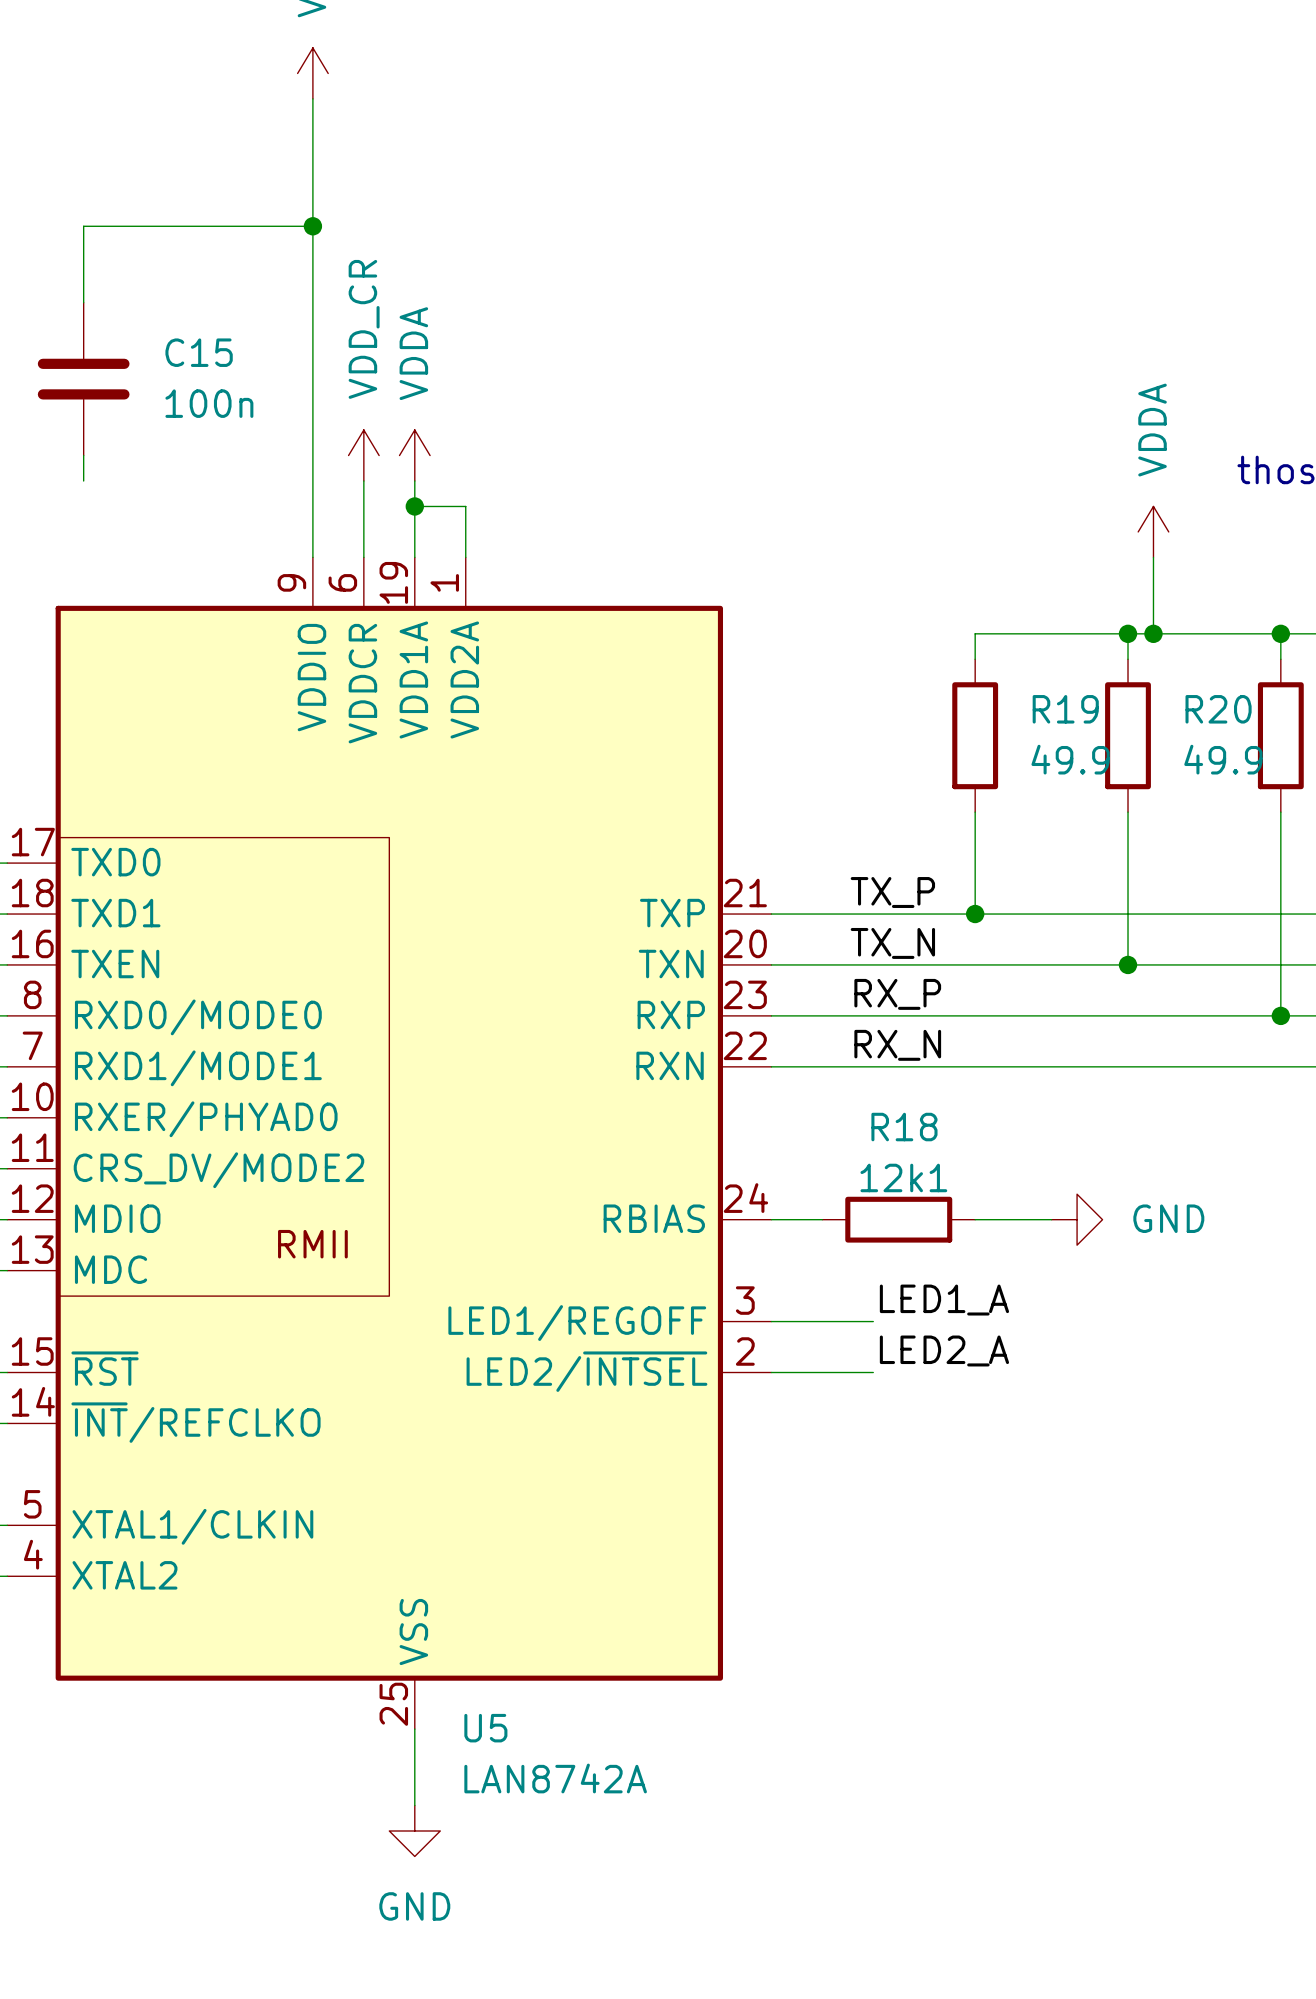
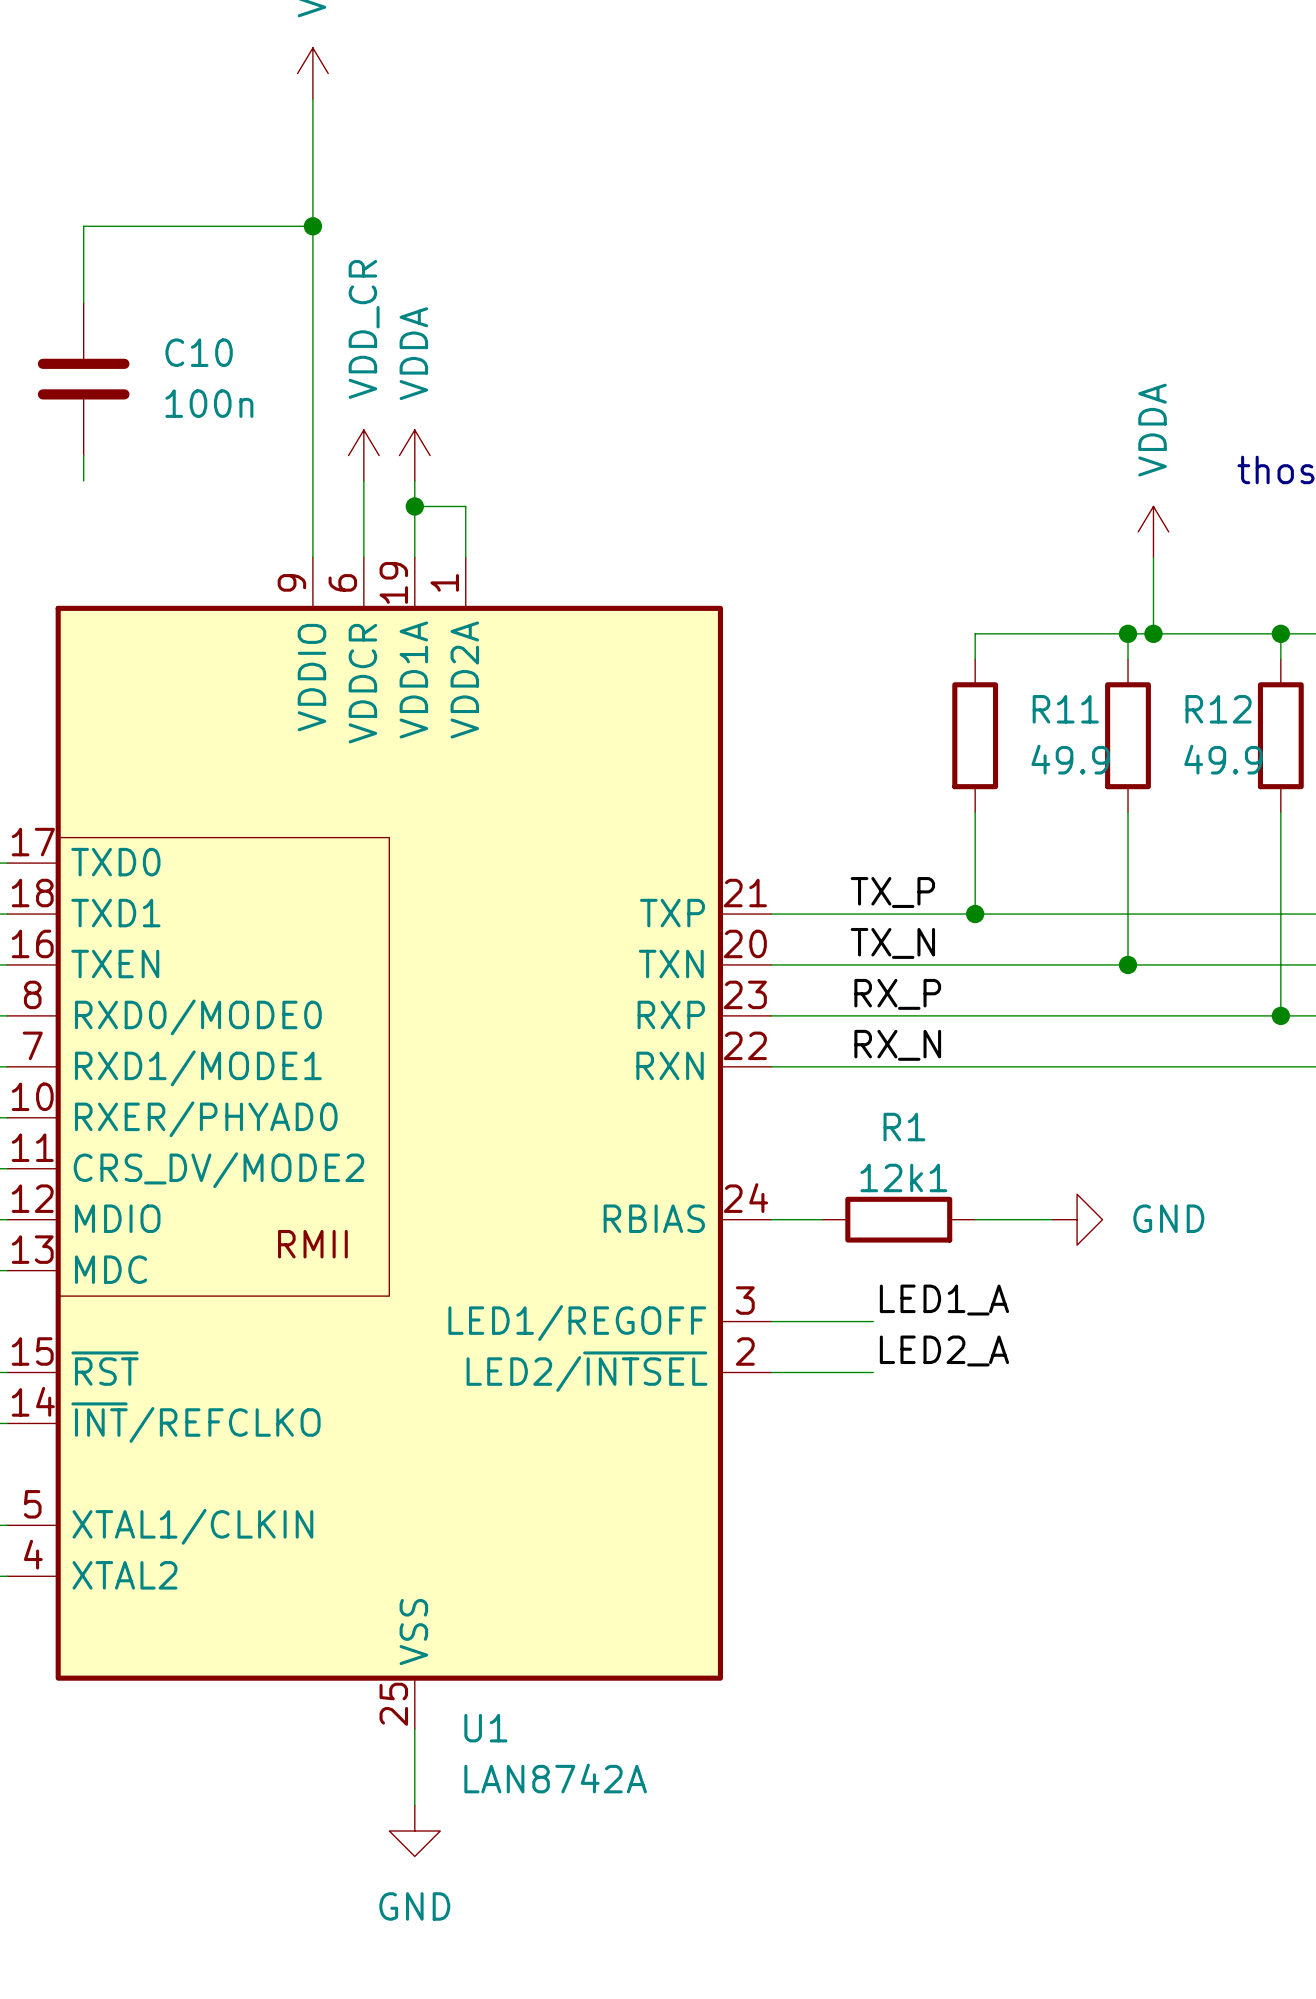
C15 name: C15 (199, 352) -> C10 (199, 352)
R19 name: R19 (1065, 709) -> R11 (1065, 709)
R20 name: R20 (1218, 709) -> R12 (1218, 709)
R18 name: R18 (904, 1127) -> R1 (904, 1127)
U5 name: U5 (485, 1728) -> U1 (485, 1728)

